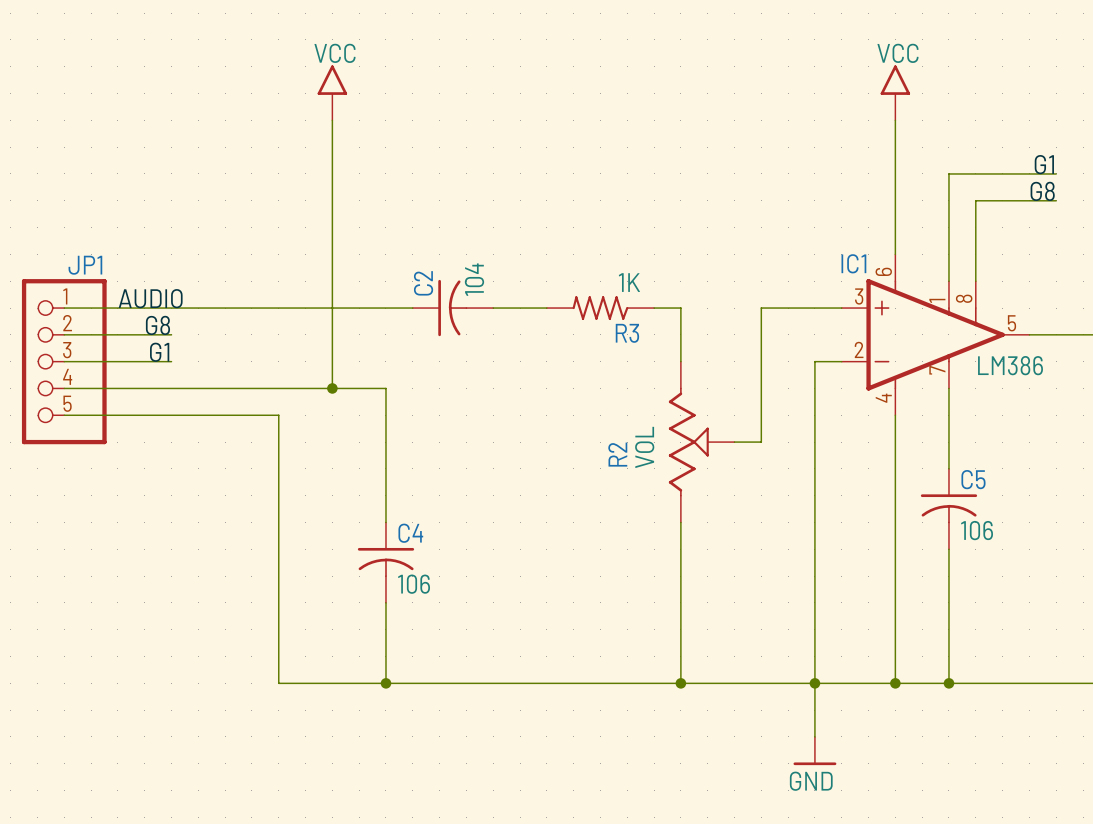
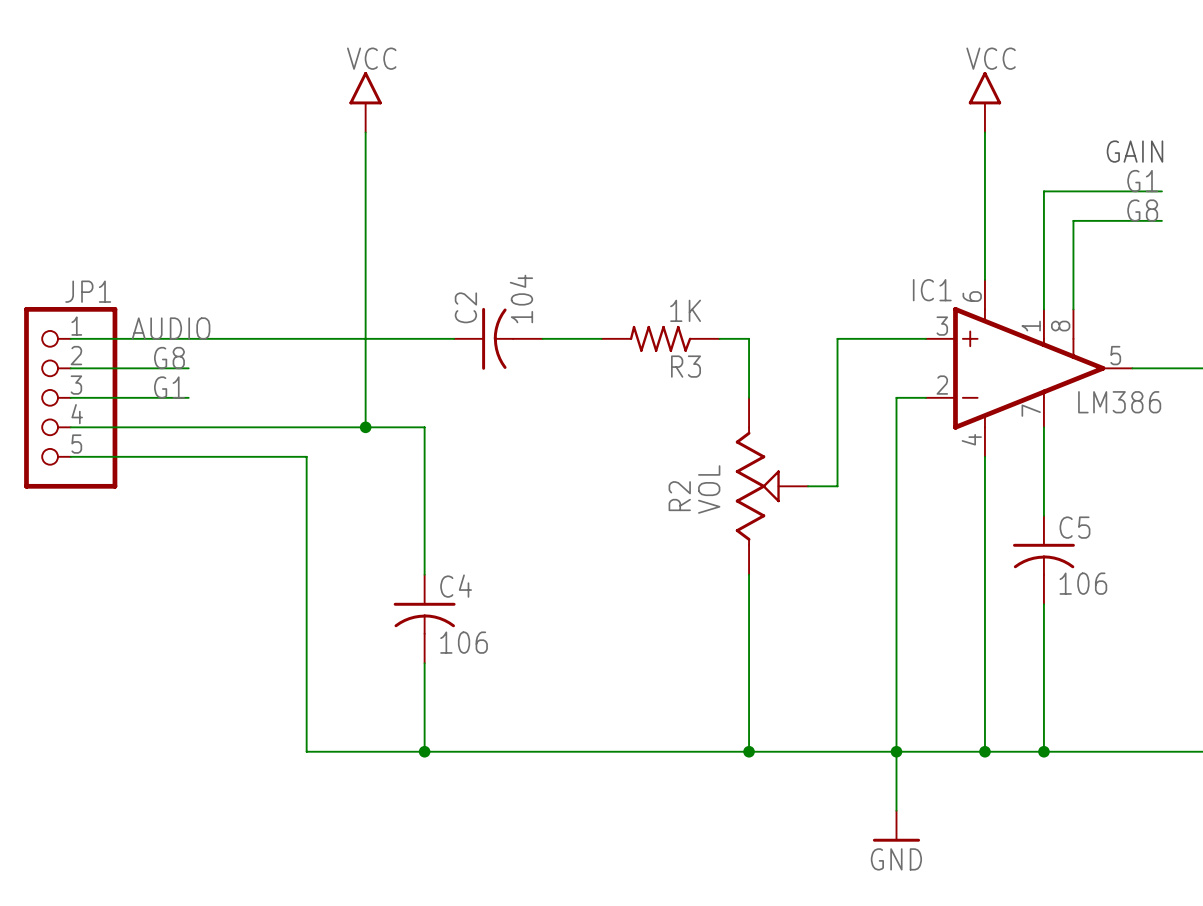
text: none -> GAIN (1134, 151)

